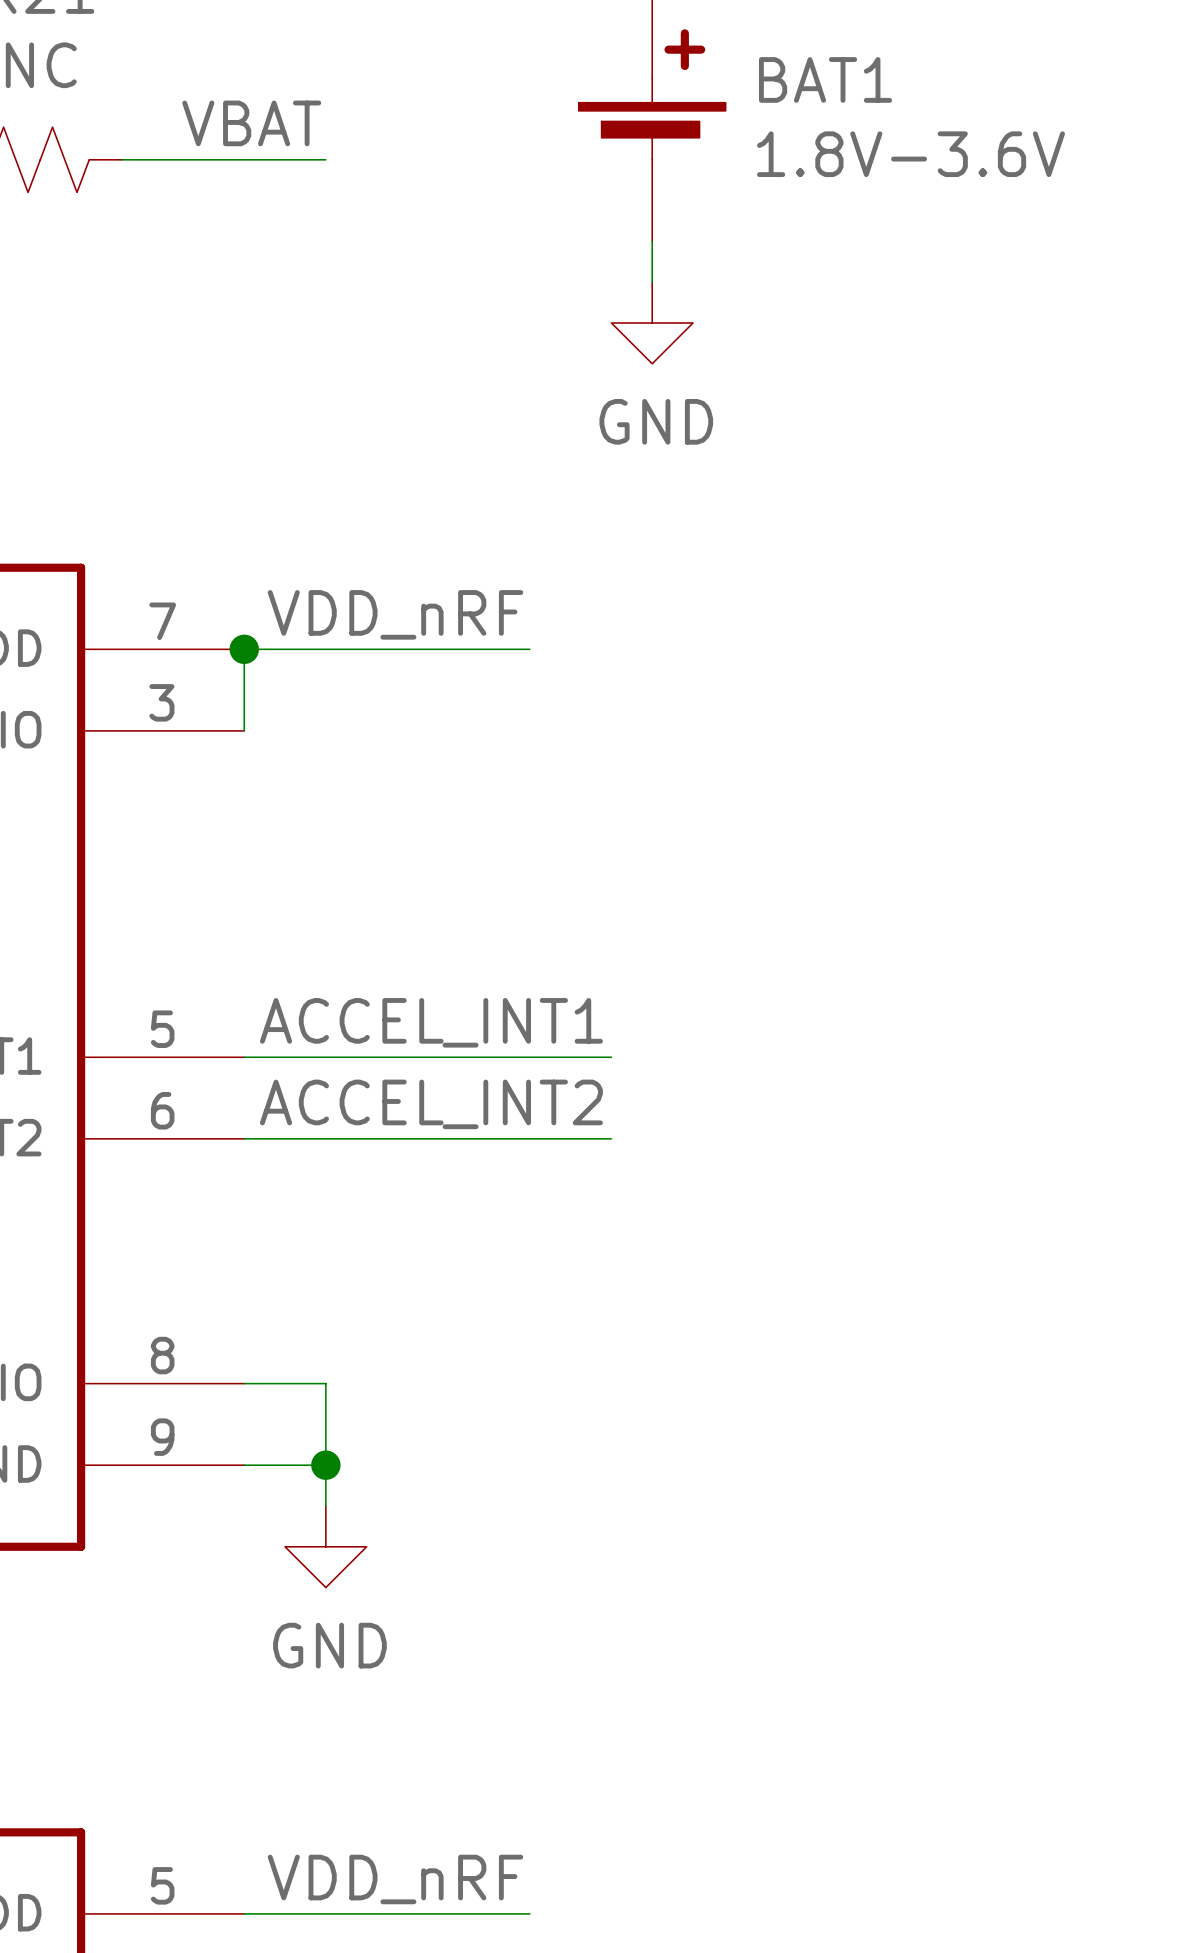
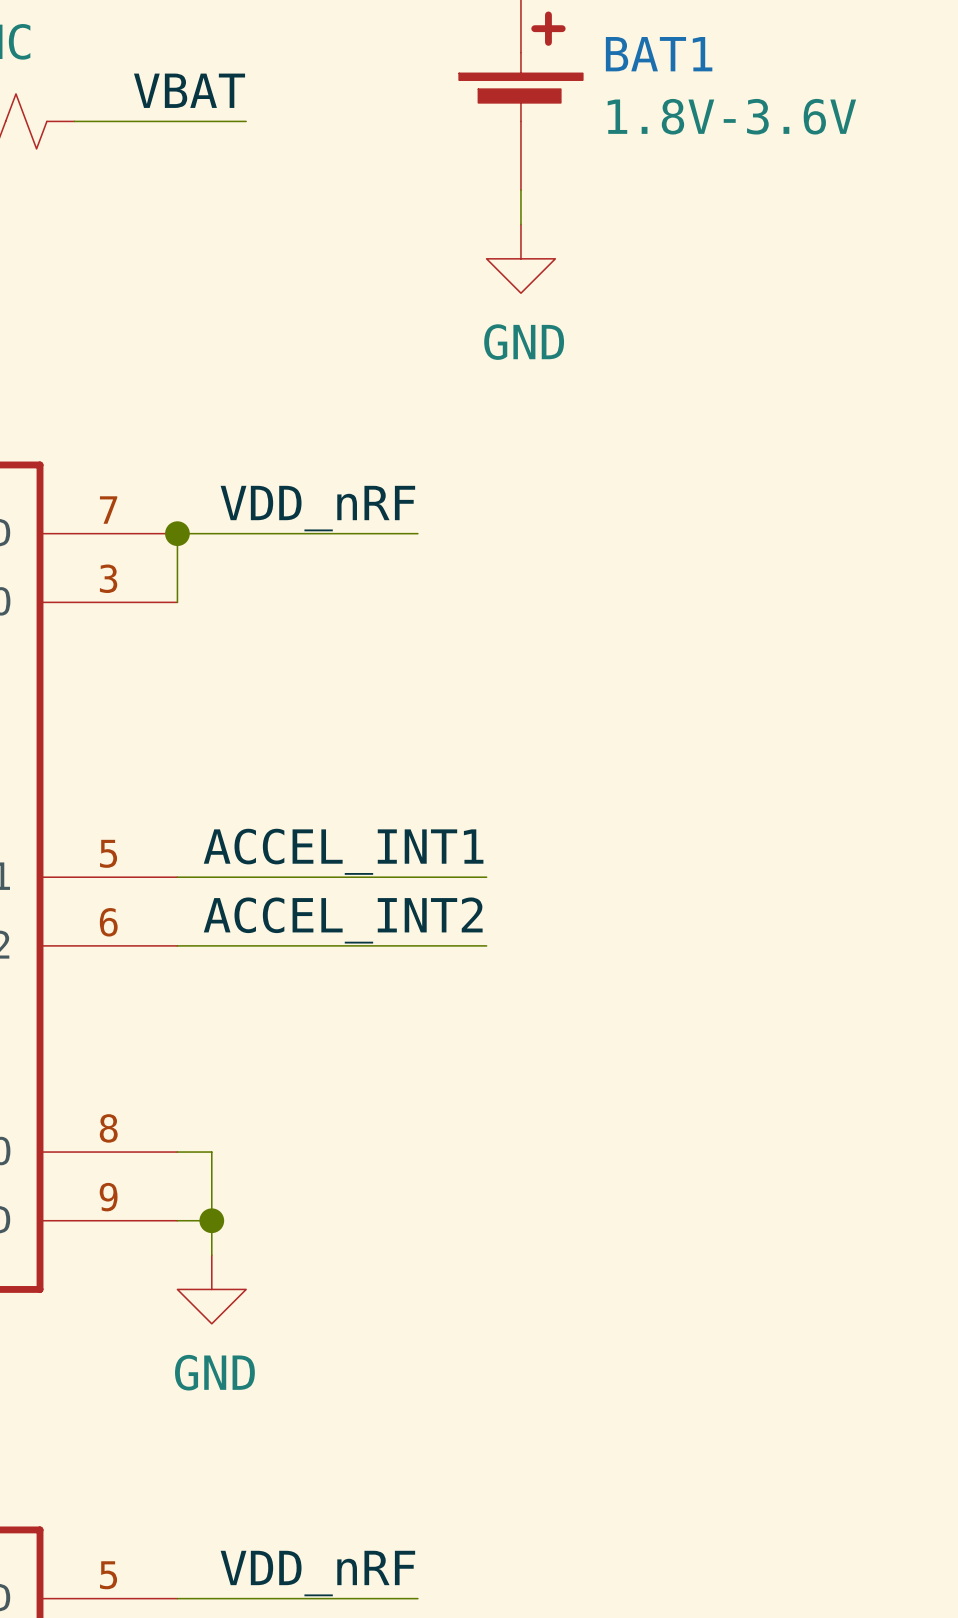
wire: (285, 1383) (325, 1383) (325, 1505) -> (211, 1152) (211, 1255)
wire: (285, 1465) (325, 1465) -> none
junction position: (325, 1465) -> (211, 1220)
power symbol position: GND (325, 1546) -> GND (211, 1289)

